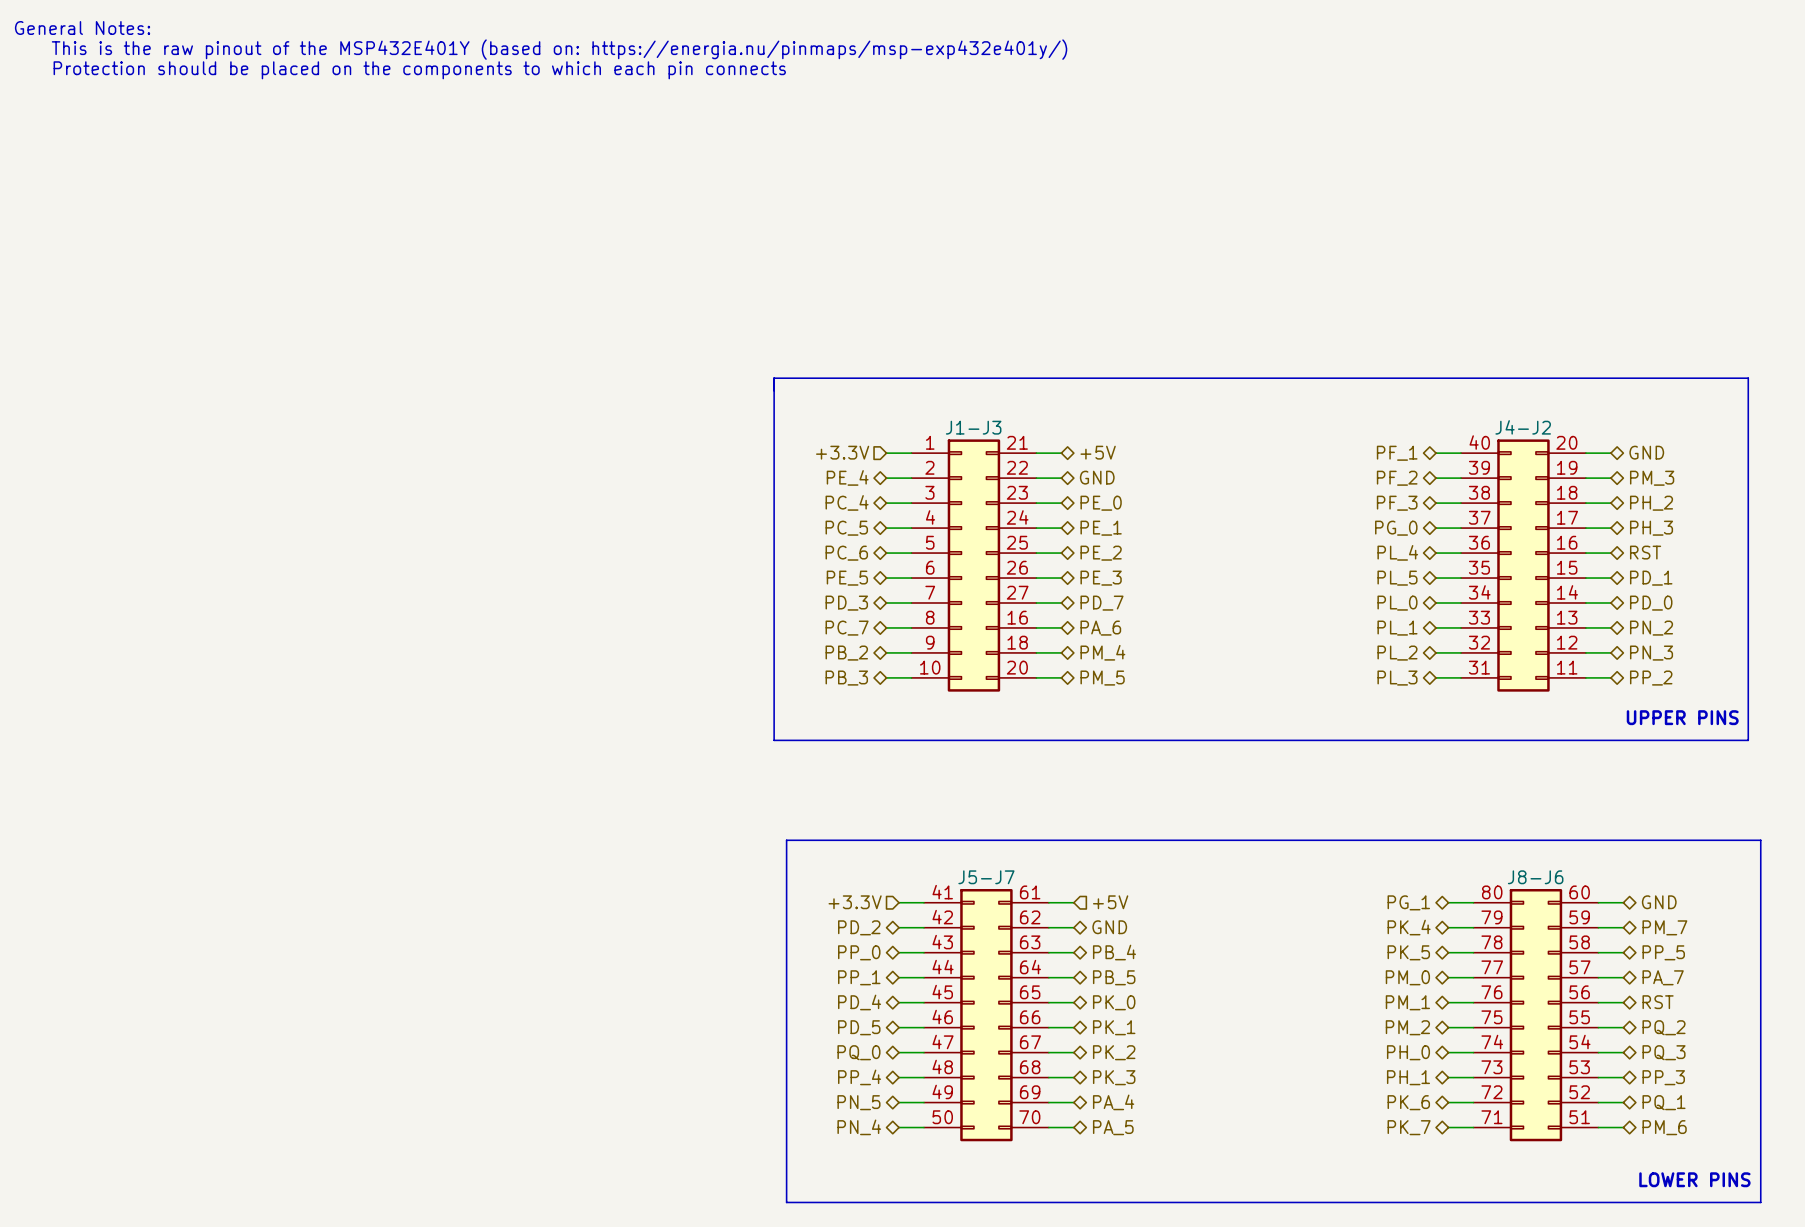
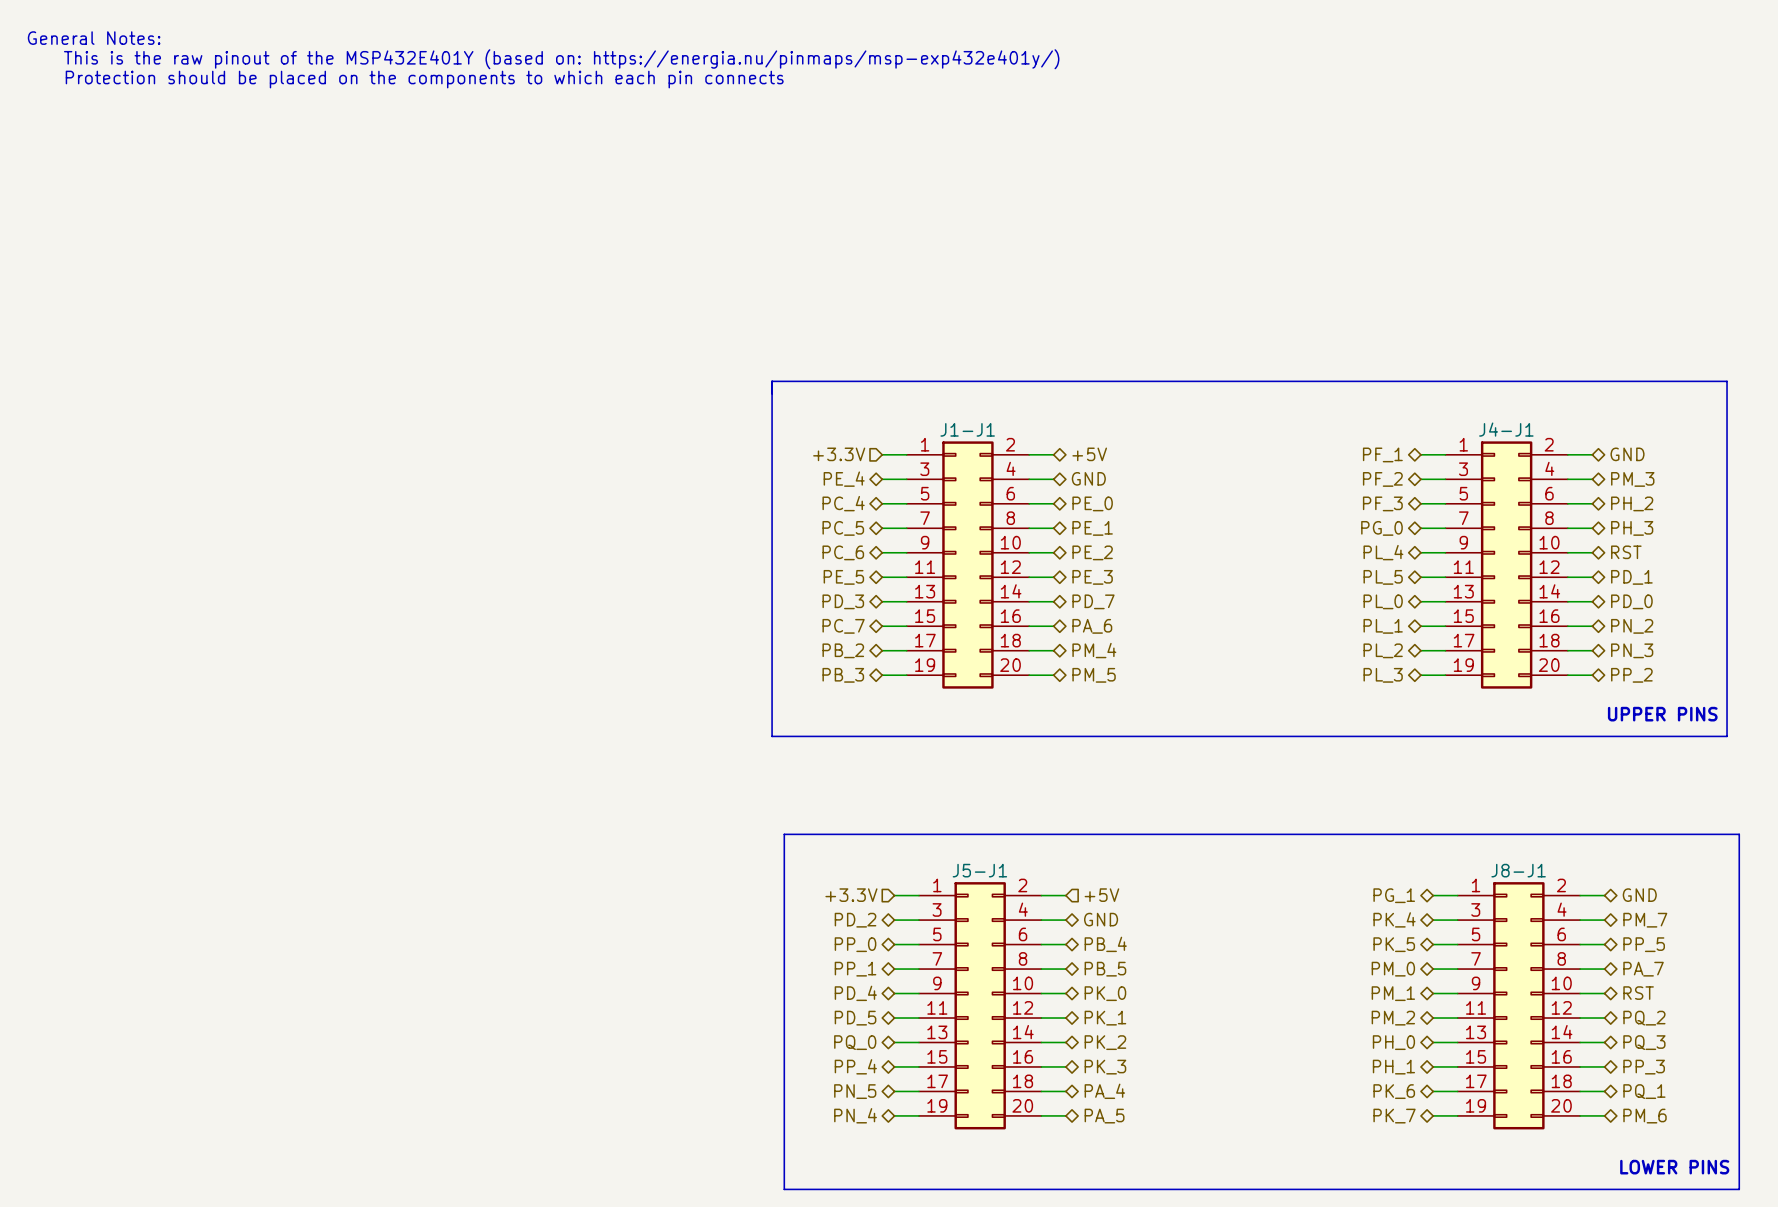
J1-J3 name: J1-J3 (973, 427) -> J1-J1 (967, 429)
J4-J2 name: J4-J2 (1523, 427) -> J4-J1 (1506, 429)
J1-J3 symbol: [911, 439, 1037, 692] -> [906, 441, 1030, 689]
J4-J2 symbol: [1461, 439, 1586, 692] -> [1445, 441, 1568, 689]
J5-J7 name: J5-J7 (986, 877) -> J5-J1 (979, 870)
J8-J6 name: J8-J6 (1535, 877) -> J8-J1 (1518, 870)
J5-J7 symbol: [923, 888, 1049, 1142] -> [918, 882, 1042, 1130]
J8-J6 symbol: [1473, 888, 1599, 1142] -> [1457, 882, 1581, 1130]

